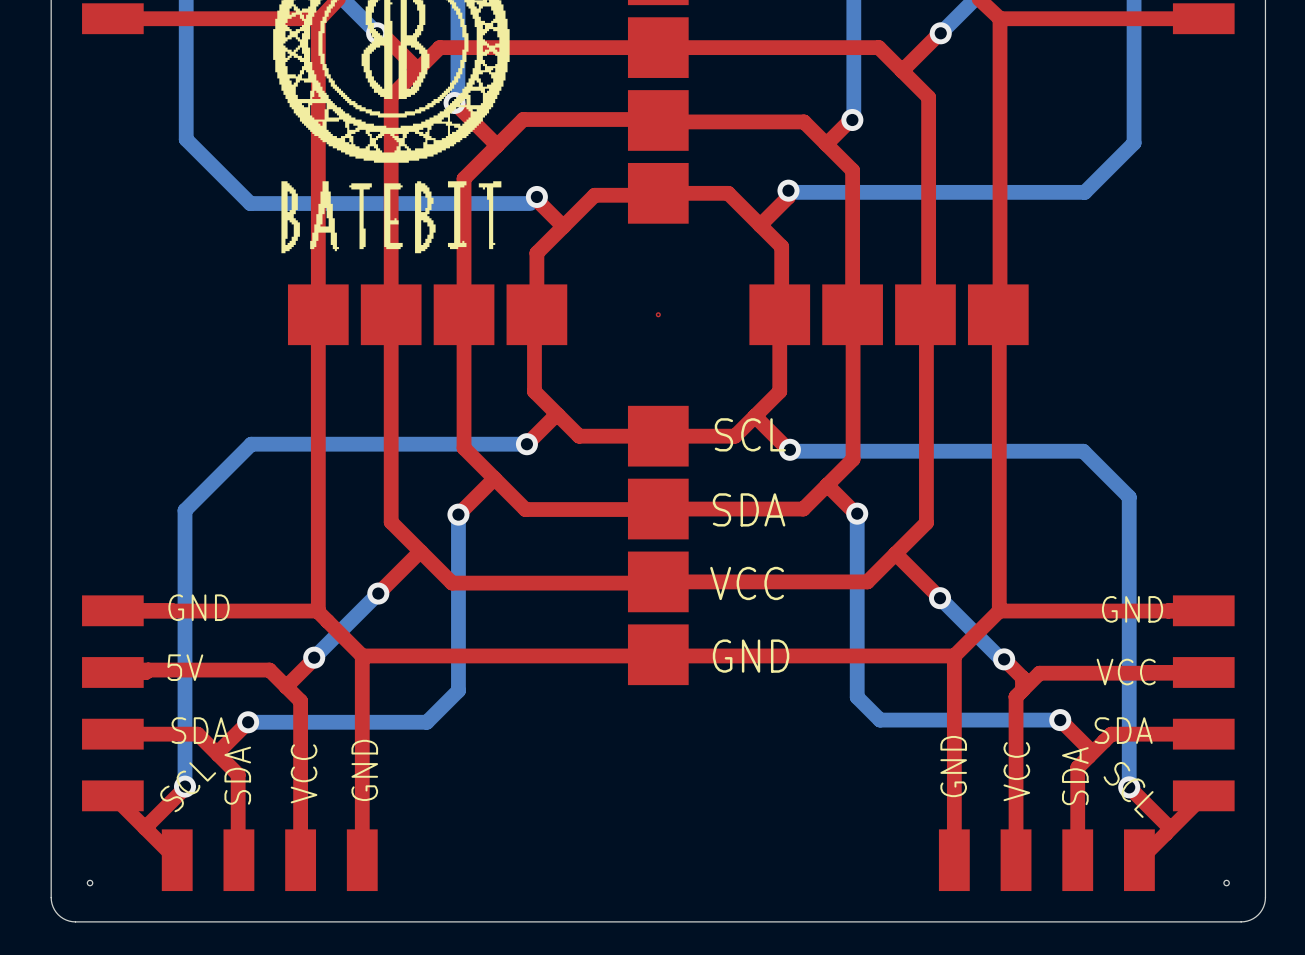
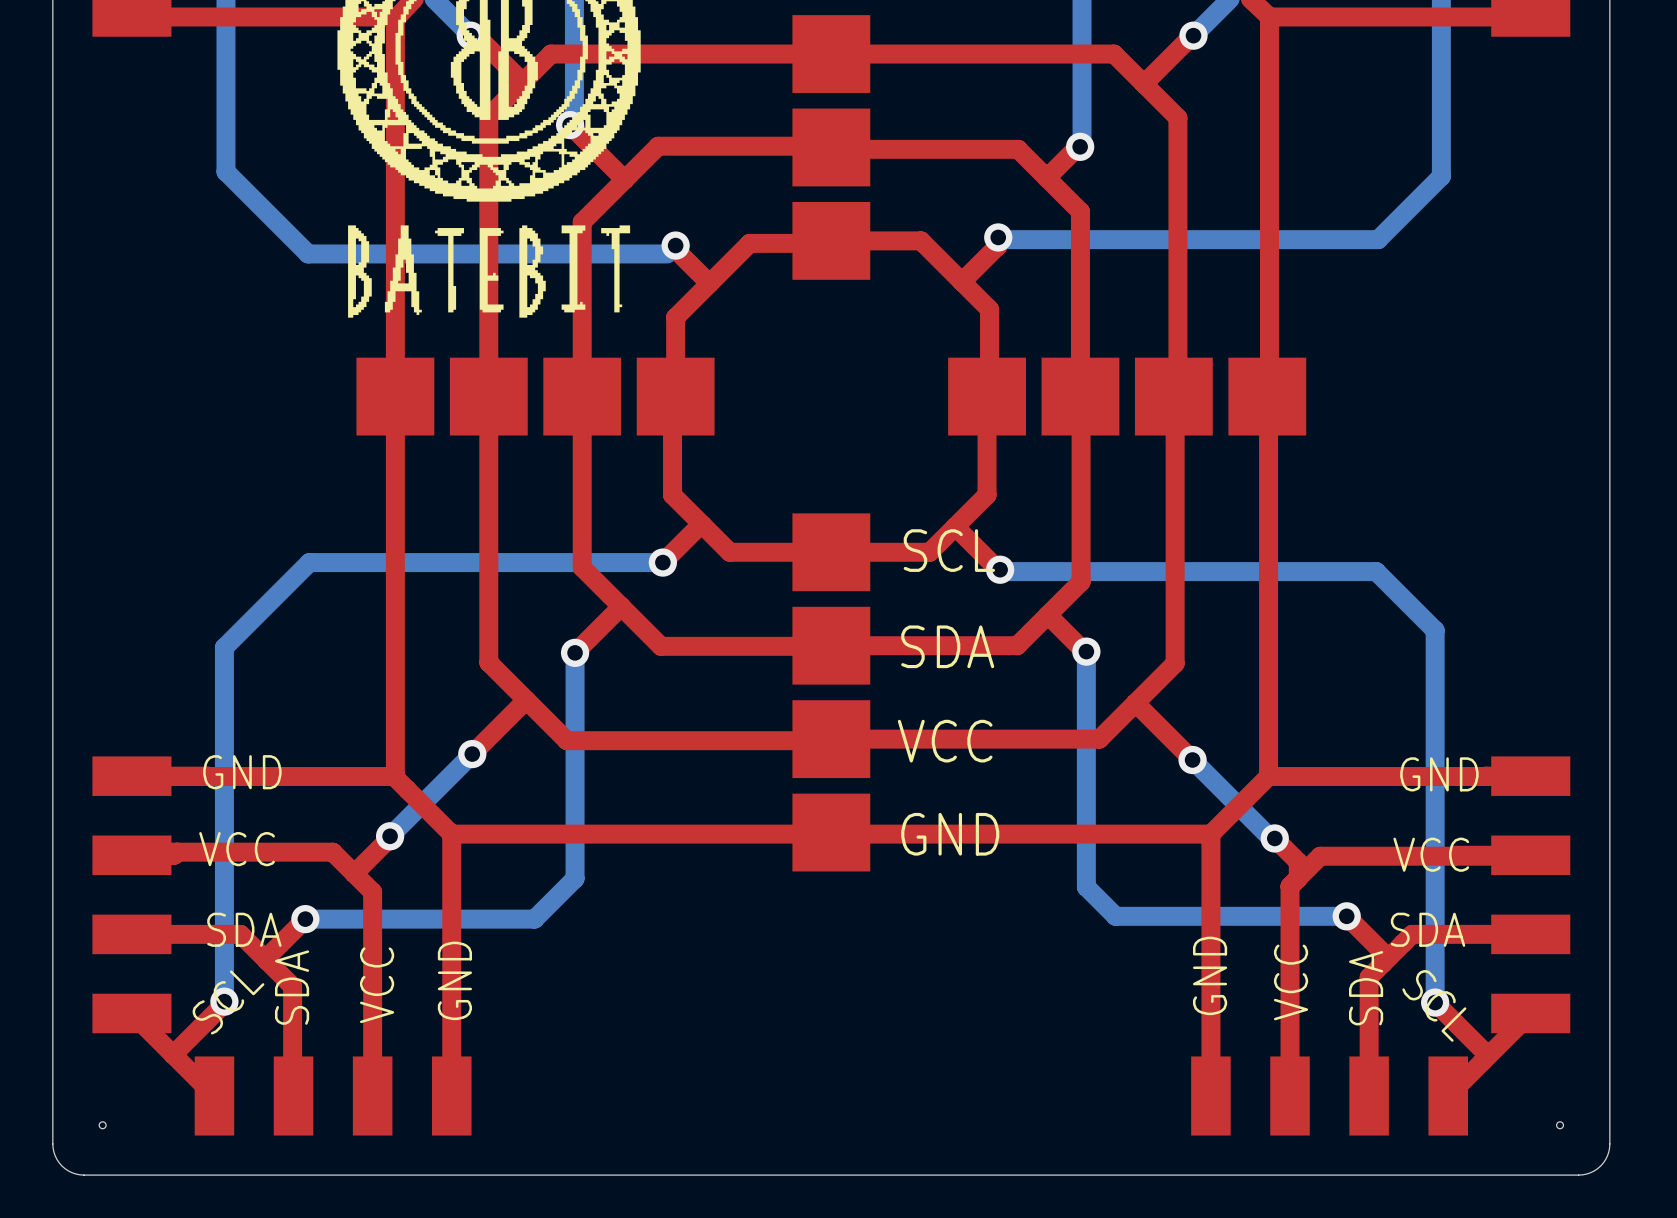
drawing: [655, 312, 661, 318] -> none
text: 5V (185, 667) -> VCC (237, 849)

